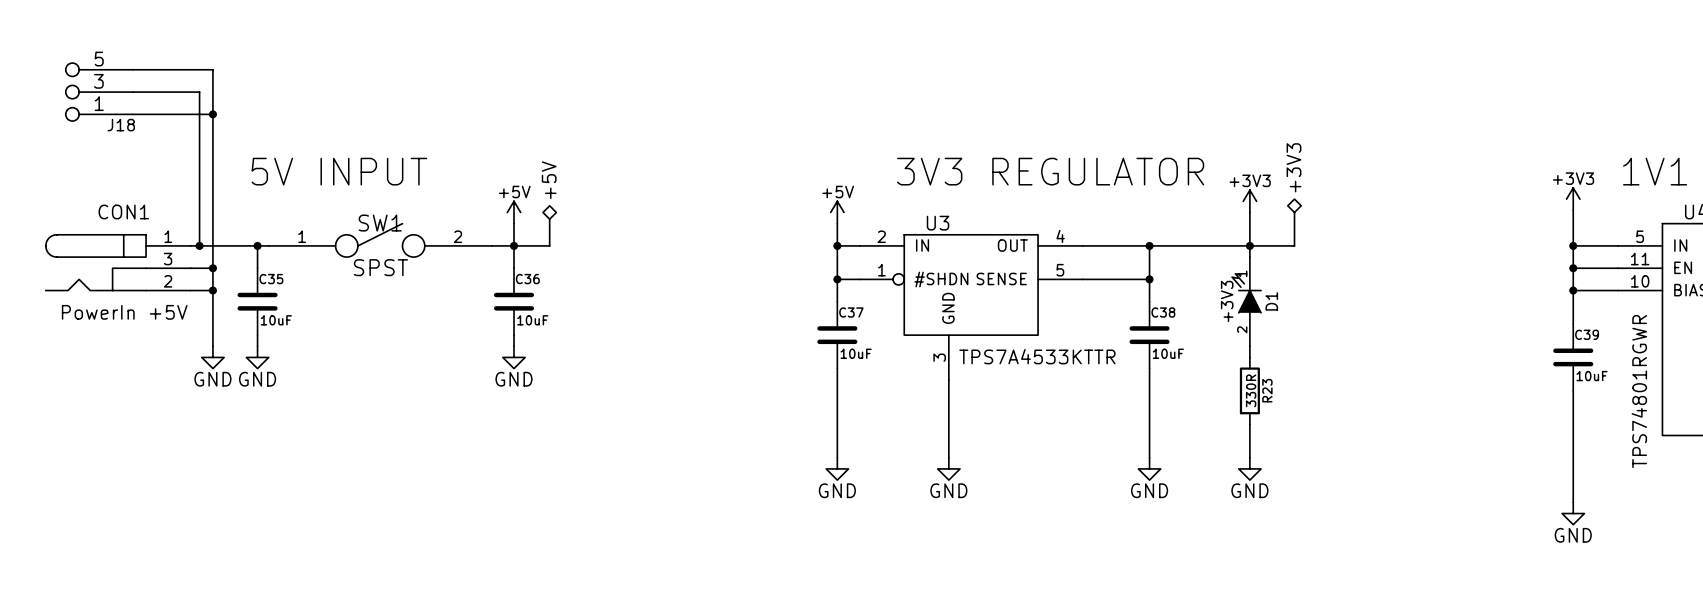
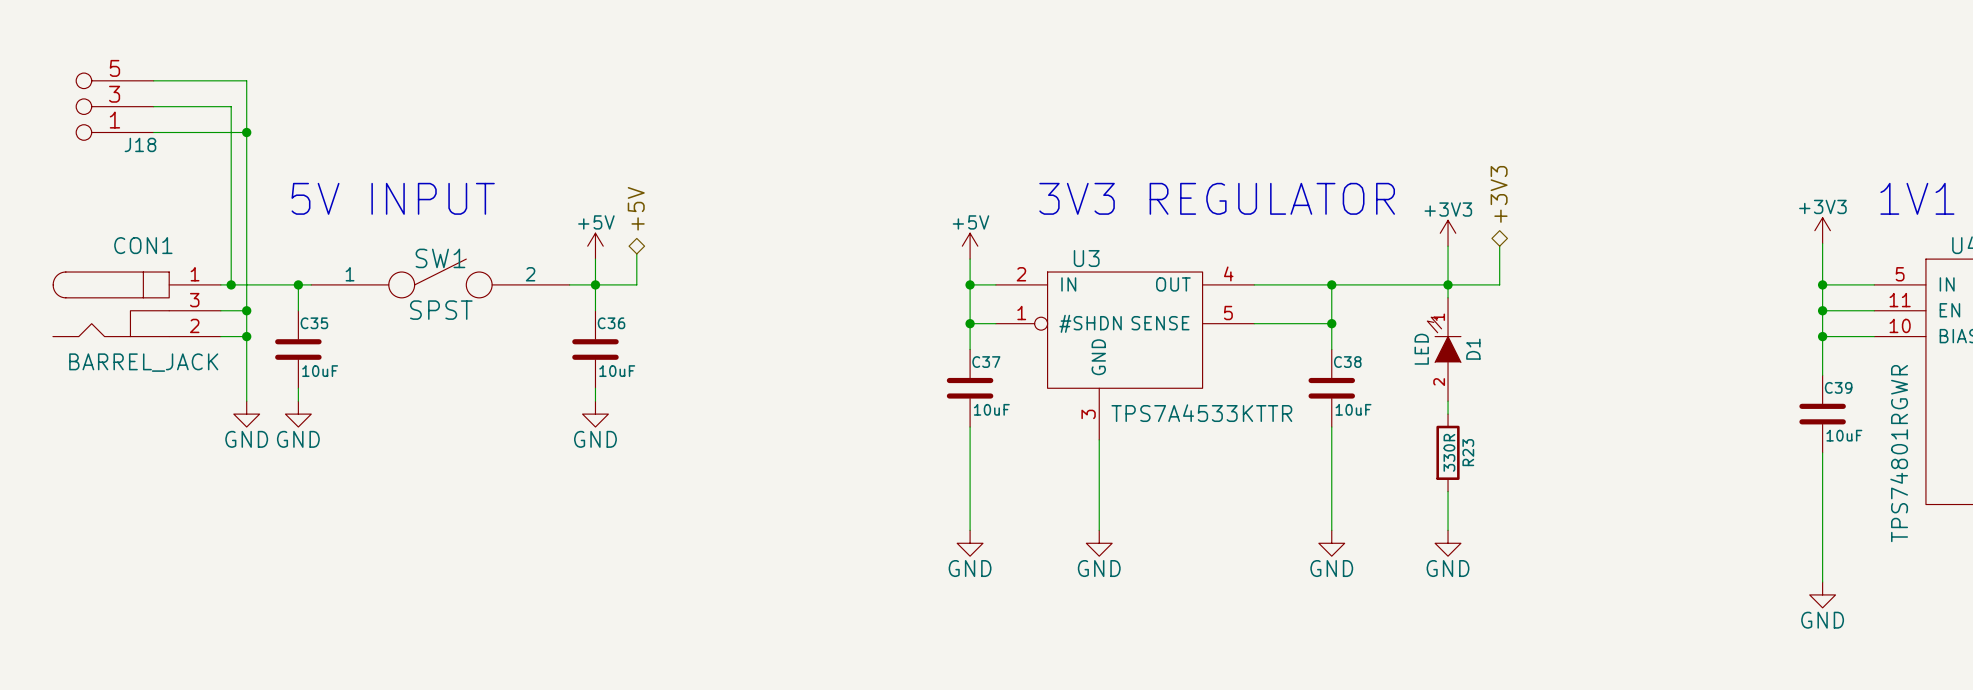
D1 value: +3V3 (1227, 301) -> LED (1421, 349)
CON1 value: PowerIn +5V (124, 312) -> BARREL_JACK (143, 362)

